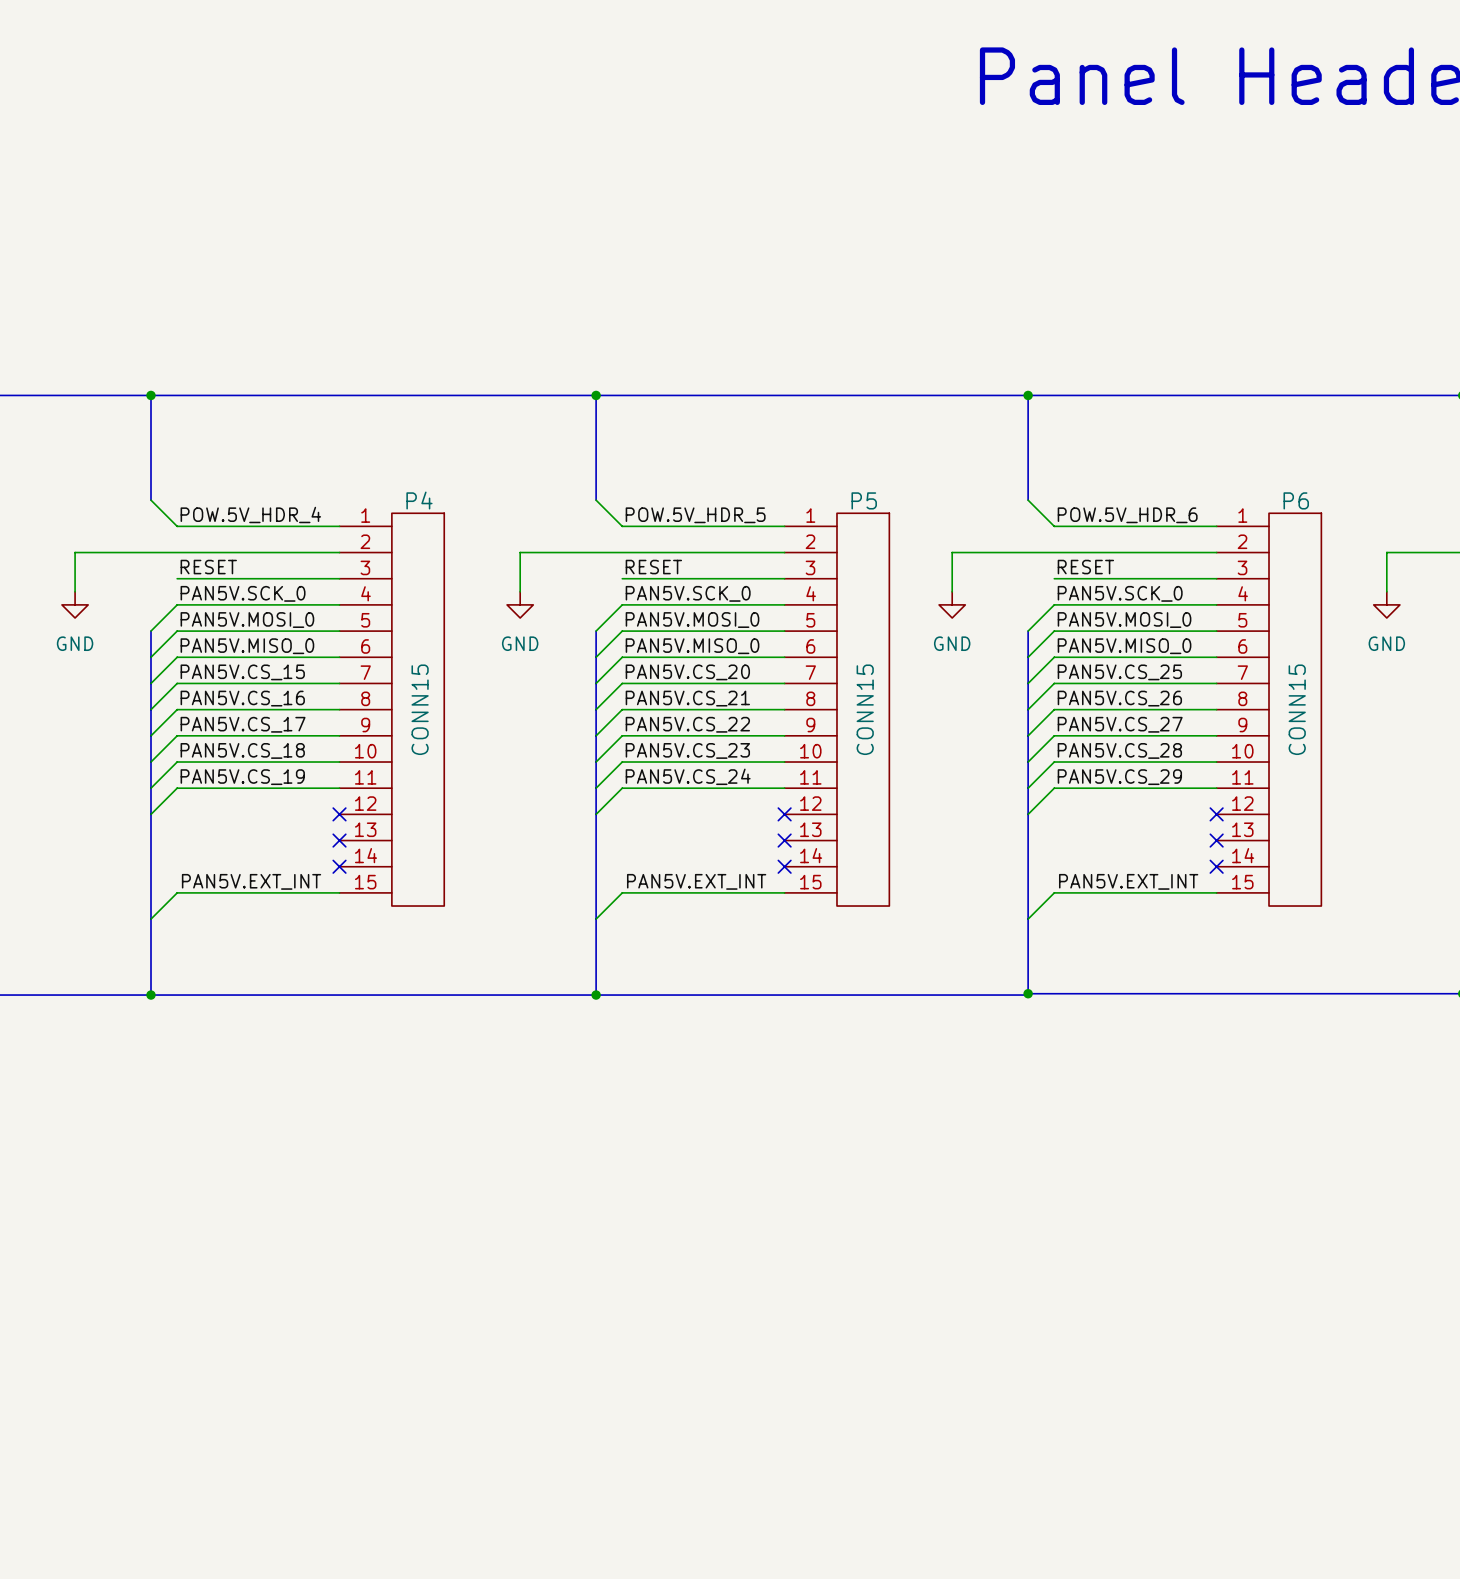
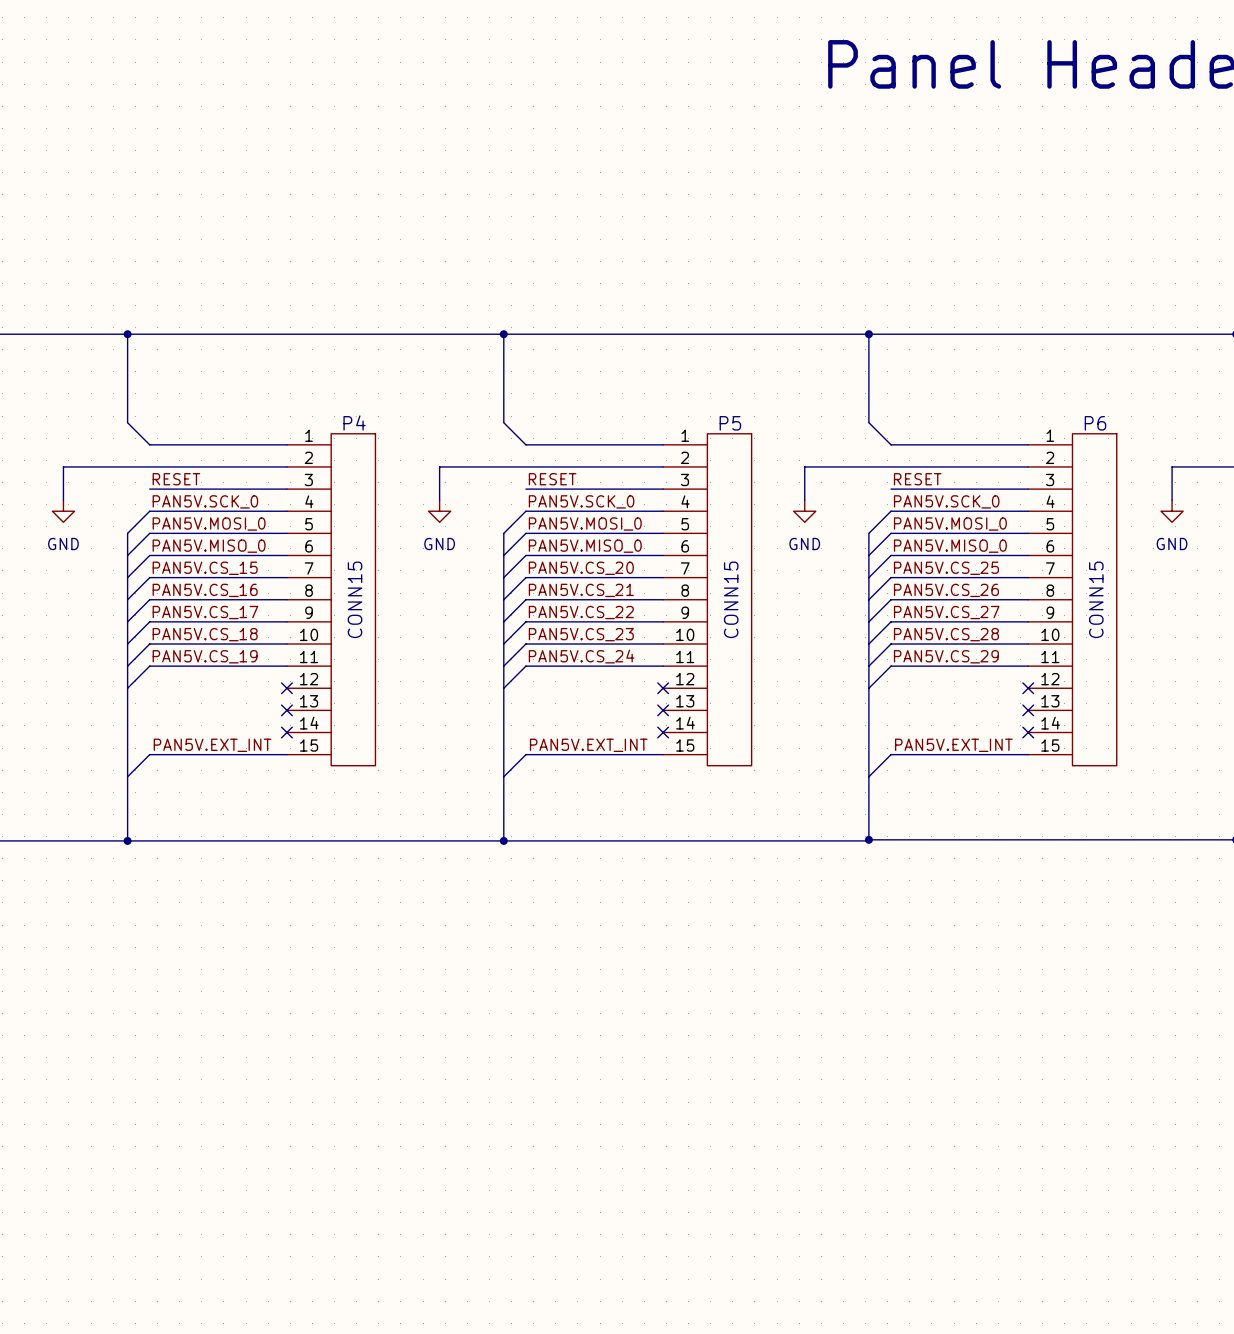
label: POW.5V_HDR_4 (250, 514) -> none
label: POW.5V_HDR_5 (695, 515) -> none
label: POW.5V_HDR_6 (1127, 515) -> none

